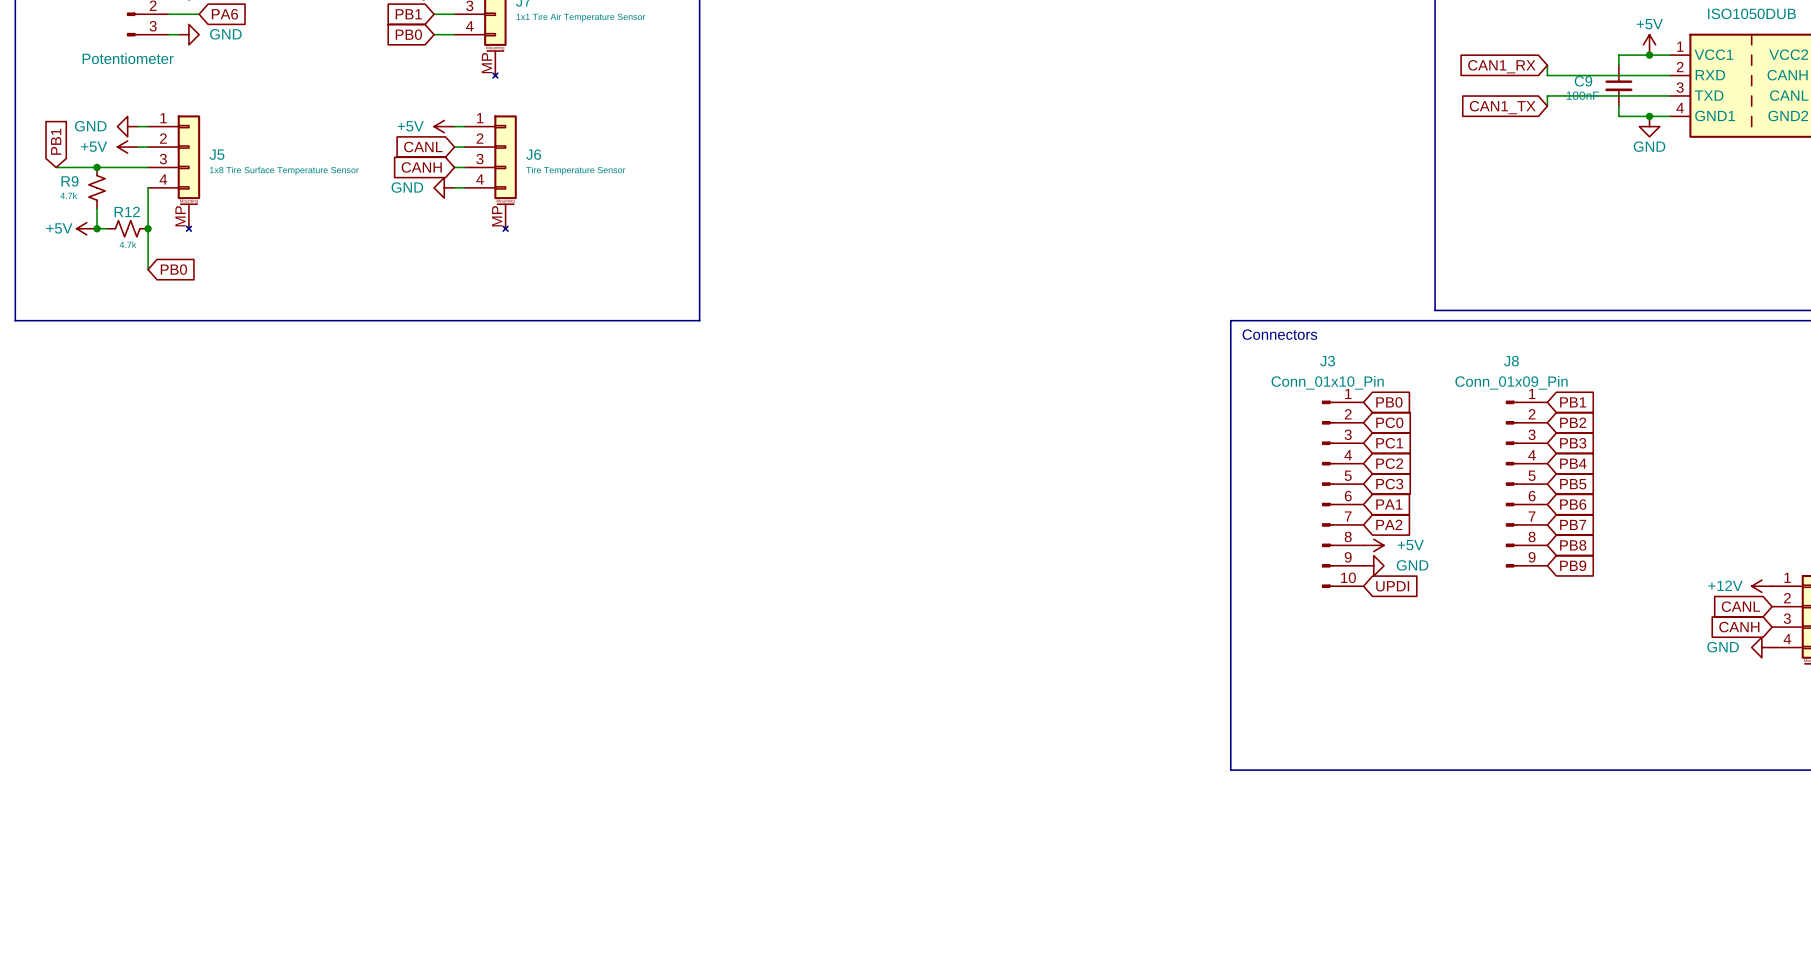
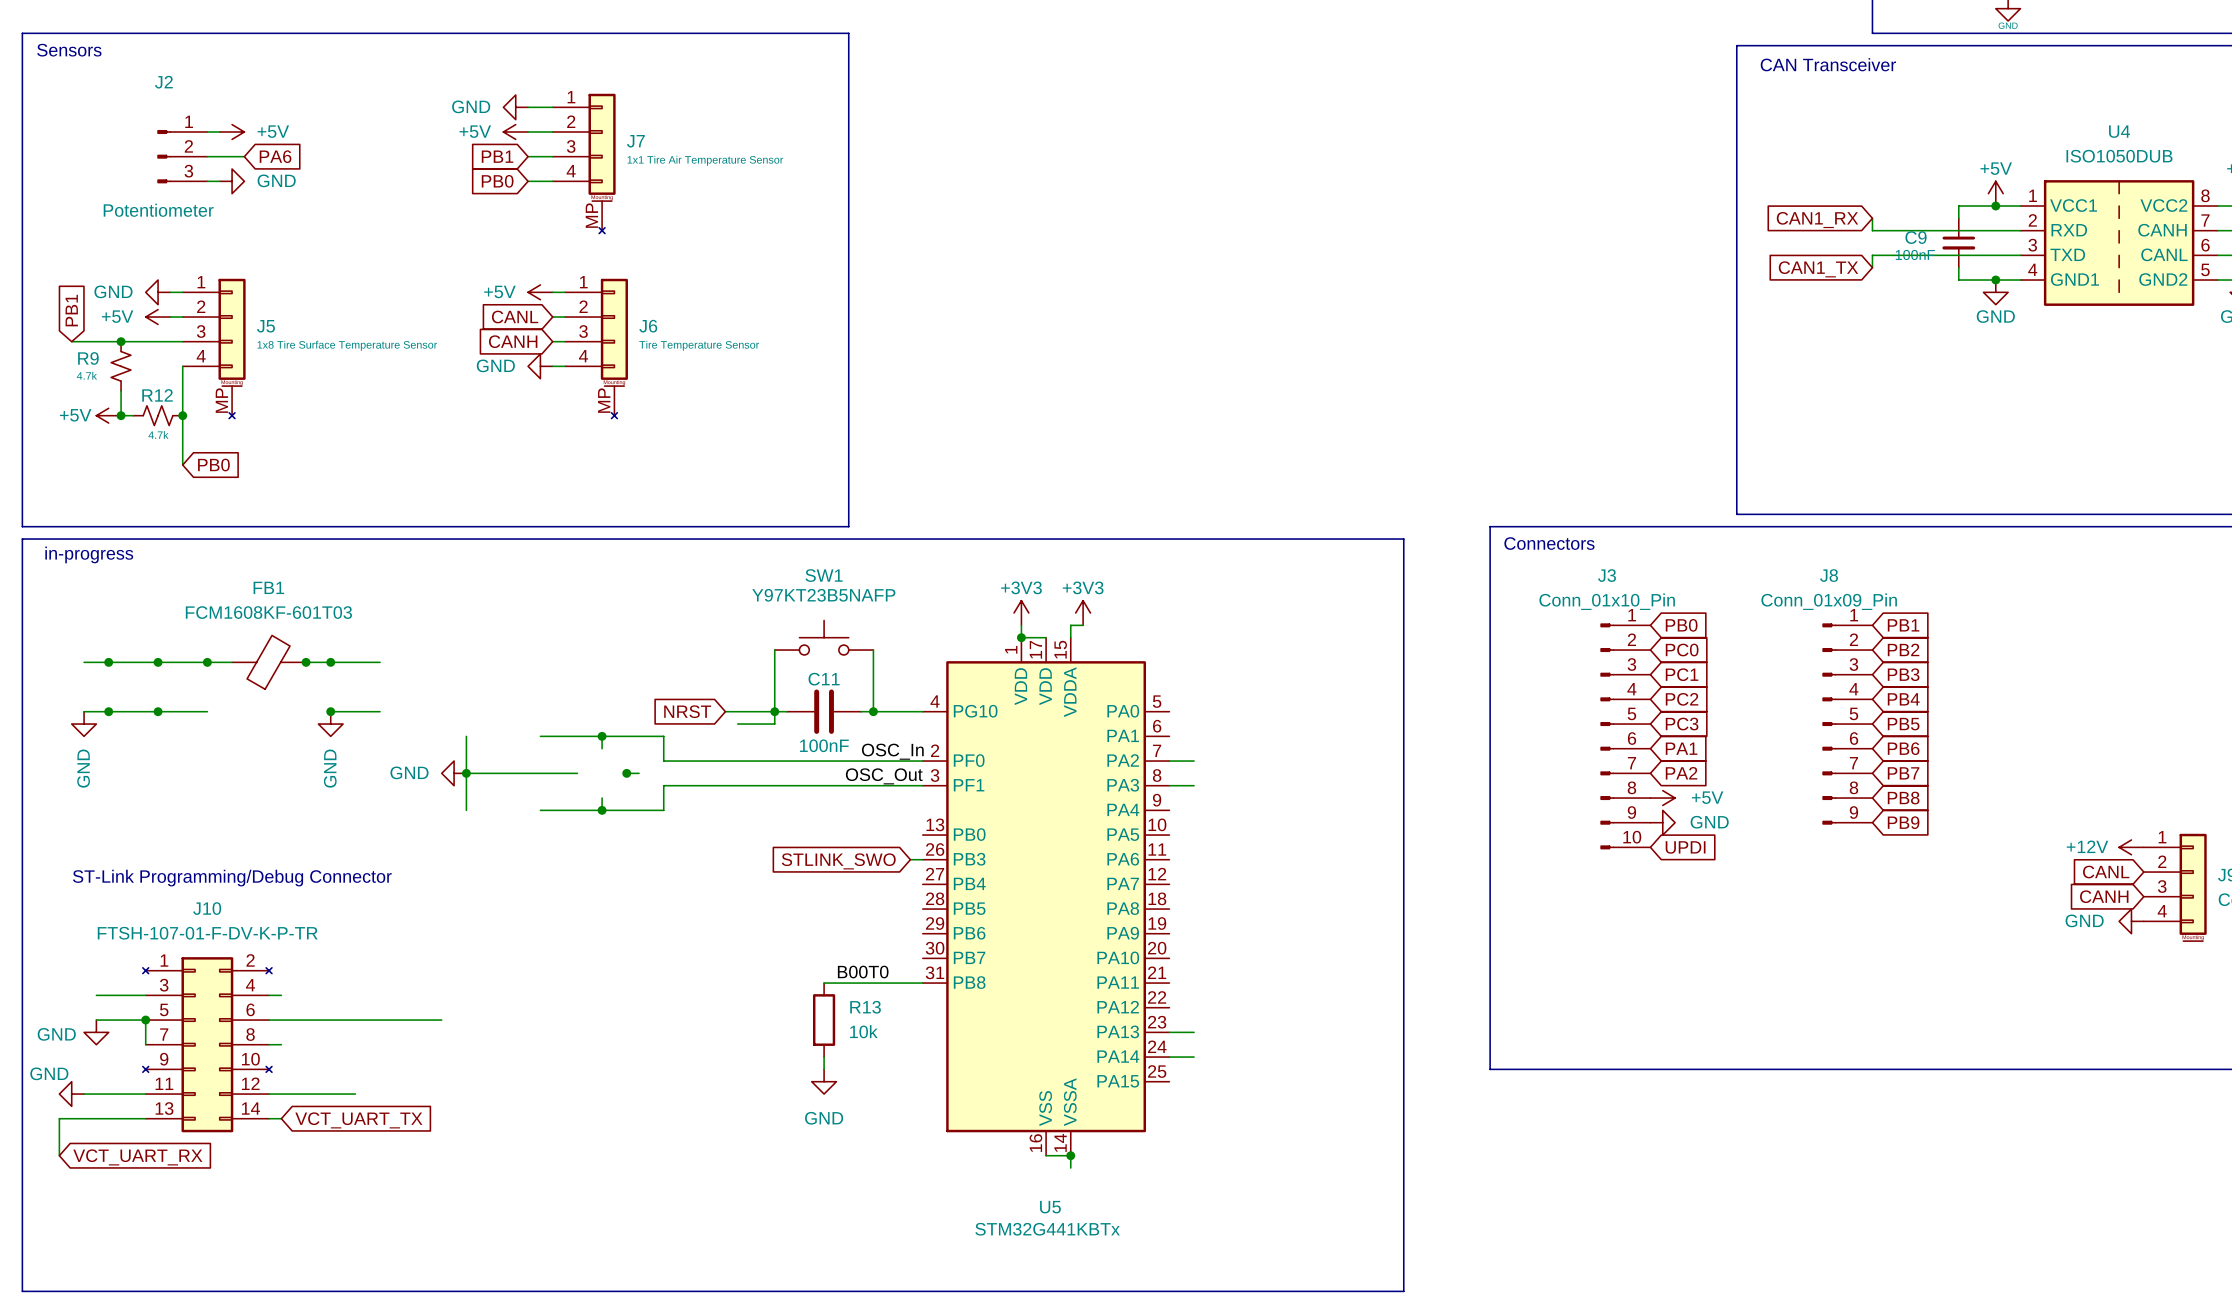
line: none -> (22, 539) (1403, 539) (1403, 1291) (22, 1291) (22, 539)
text: none -> in-progress (89, 554)
power symbol: none -> +3V3 (1021, 613)
power symbol: none -> +3V3 (1083, 613)
wire: none -> (1021, 625) (1021, 637) (1046, 637)
wire: none -> (1083, 625) (1070, 625) (1070, 637)
SW1: none -> Y97KT23B5NAFP (824, 637)
junction: none -> (1021, 637)
wire: none -> (774, 650) (774, 724) (737, 724)
wire: none -> (873, 650) (873, 711)
wire: none -> (84, 662) (232, 662)
junction: none -> (108, 662)
junction: none -> (158, 662)
junction: none -> (207, 662)
FB1: none -> FCM1608KF-601T03 (269, 662)
wire: none -> (306, 662) (380, 662)
junction: none -> (306, 662)
junction: none -> (330, 662)
wire: none -> (84, 711) (207, 711)
junction: none -> (108, 711)
junction: none -> (158, 711)
wire: none -> (330, 711) (380, 711)
junction: none -> (330, 711)
global label: none -> NRST (687, 711)
wire: none -> (725, 711) (787, 711)
junction: none -> (774, 711)
C11: none -> 100nF (824, 711)
wire: none -> (861, 711) (922, 711)
junction: none -> (873, 711)
power symbol: none -> GND (84, 724)
power symbol: none -> GND (330, 724)
wire: none -> (466, 736) (466, 810)
wire: none -> (540, 736) (663, 736) (663, 761) (922, 761)
wire: none -> (602, 736) (602, 748)
junction: none -> (602, 736)
label: none -> OSC_In (892, 751)
wire: none -> (1169, 761) (1194, 761)
power symbol: none -> GND (454, 773)
wire: none -> (466, 773) (577, 773)
junction: none -> (466, 773)
wire: none -> (626, 773) (639, 773)
junction: none -> (626, 773)
label: none -> OSC_Out (884, 776)
wire: none -> (922, 785) (663, 785) (663, 810) (540, 810)
wire: none -> (1169, 785) (1194, 785)
wire: none -> (602, 798) (602, 810)
junction: none -> (602, 810)
wire: none -> (910, 859) (922, 859)
global label: none -> STLINK_SWO (838, 861)
text: none -> ST-Link Programming/Debug Connector (232, 878)
U5: none -> STM32G441KBTx (1046, 896)
label: none -> B00T0 (863, 972)
wire: none -> (824, 983) (922, 983)
wire: none -> (96, 995) (145, 995)
wire: none -> (269, 995) (281, 995)
wire: none -> (96, 1020) (145, 1020) (145, 1044)
junction: none -> (145, 1020)
wire: none -> (269, 1020) (441, 1020)
R13: none -> 10k (824, 1020)
power symbol: none -> GND (96, 1032)
wire: none -> (1169, 1032) (1194, 1032)
J10: none -> FTSH-107-01-F-DV-K-P-TR (207, 1044)
wire: none -> (269, 1044) (281, 1044)
wire: none -> (824, 1057) (824, 1069)
wire: none -> (1169, 1057) (1194, 1057)
power symbol: none -> GND (824, 1081)
power symbol: none -> GND (71, 1094)
wire: none -> (84, 1094) (145, 1094)
wire: none -> (269, 1094) (355, 1094)
wire: none -> (145, 1118) (59, 1118) (59, 1155)
wire: none -> (269, 1118) (281, 1118)
global label: none -> VCT_UART_TX (358, 1120)
wire: none -> (1046, 1155) (1070, 1155) (1070, 1168)
junction: none -> (1070, 1155)
global label: none -> VCT_UART_RX (137, 1157)

